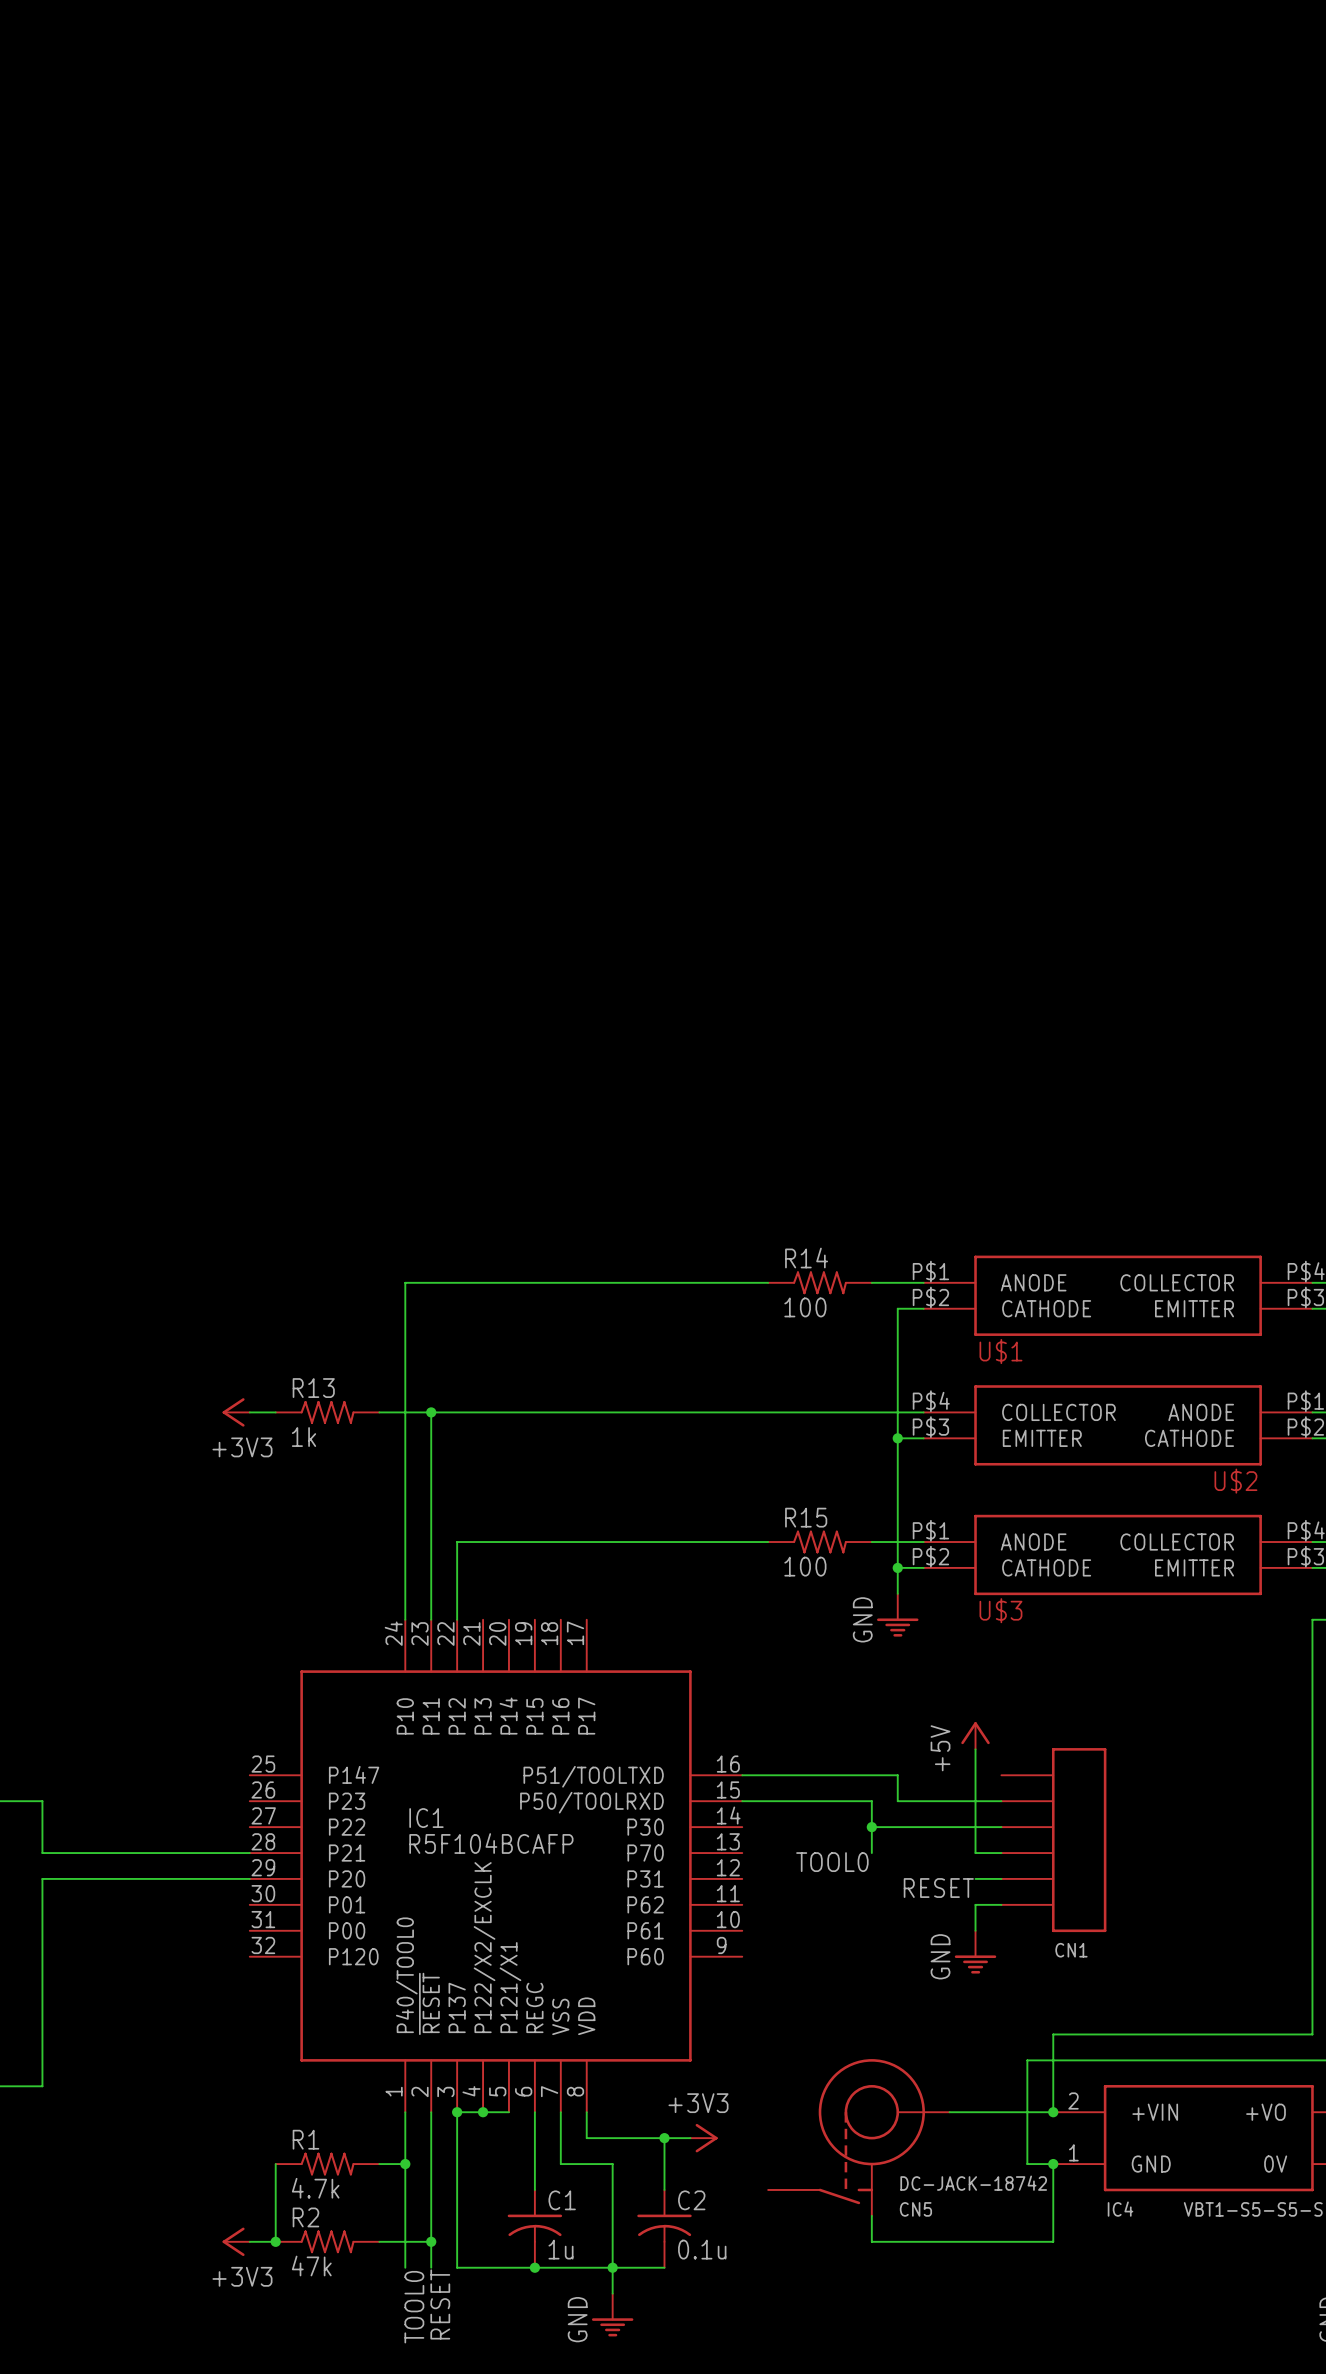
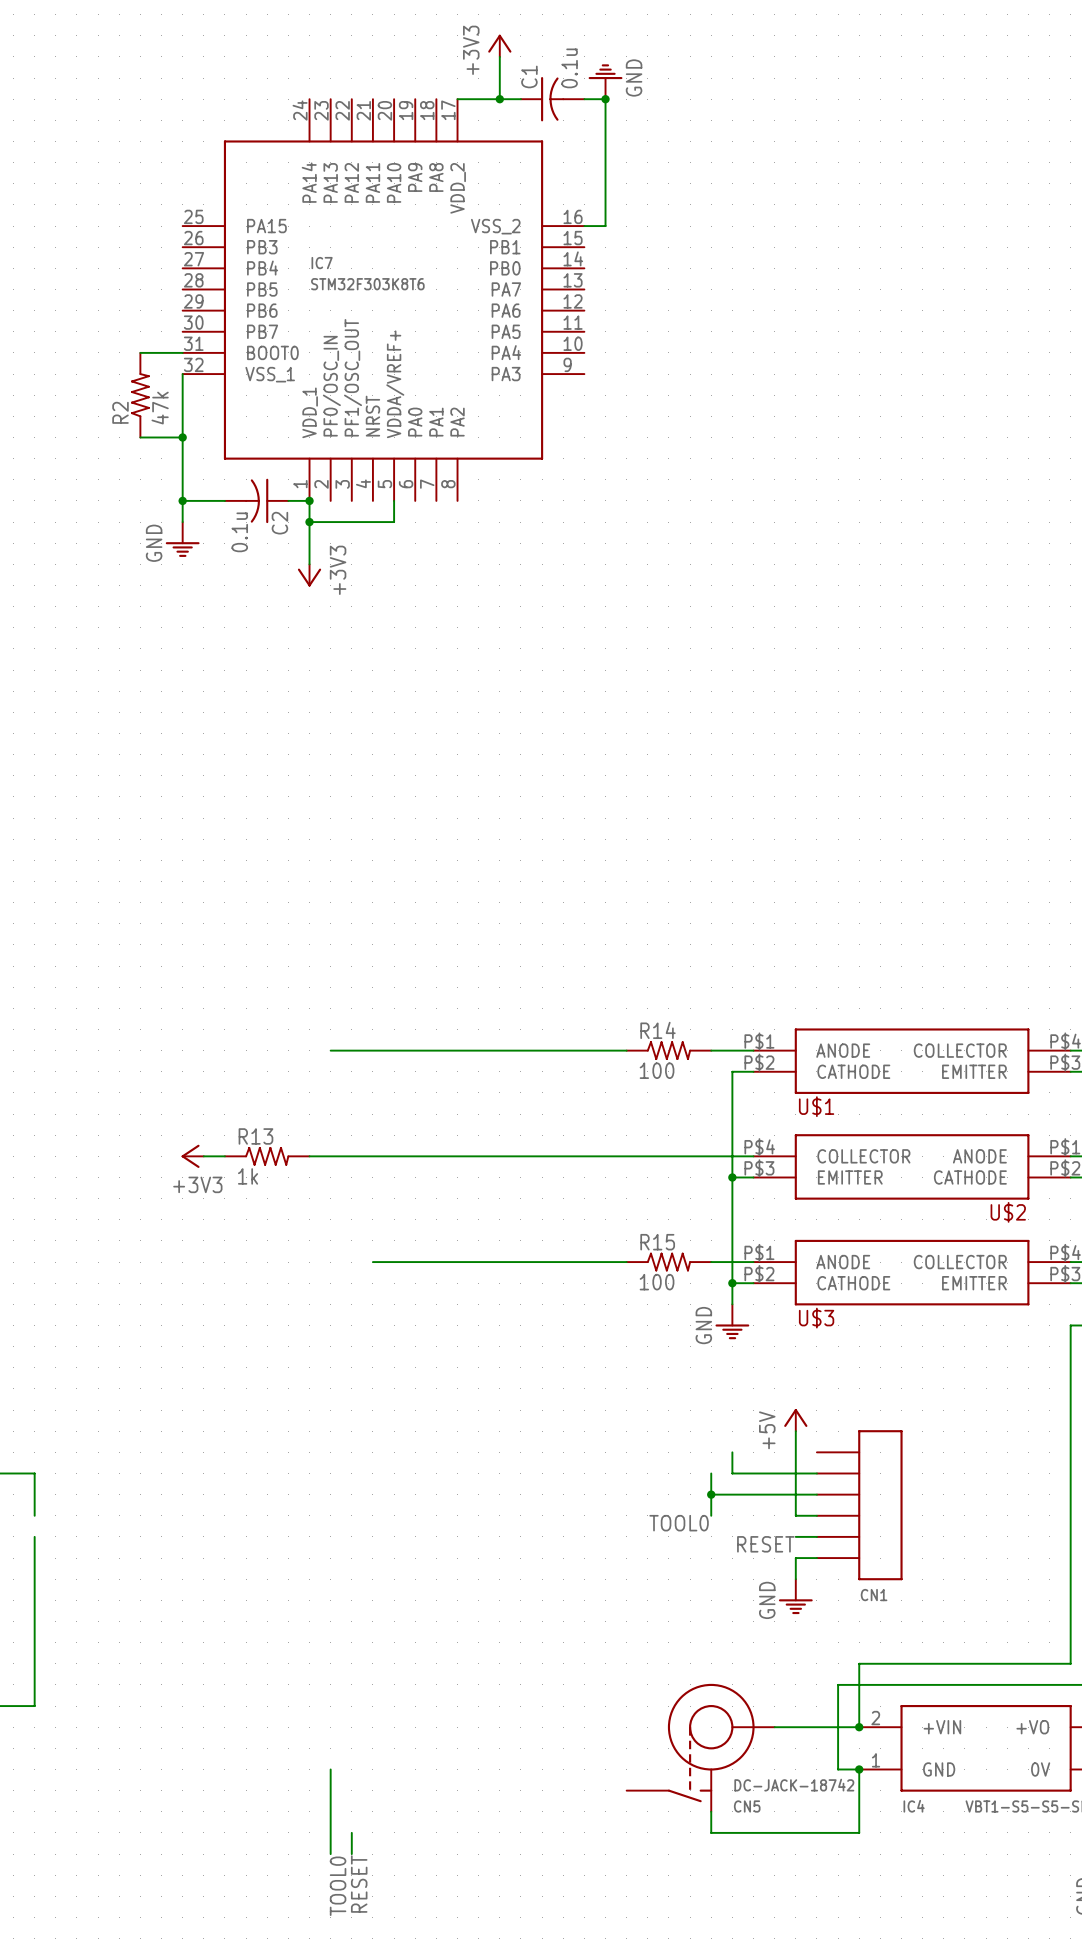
power symbol: none -> +3V3 (499, 45)
wire: none -> (499, 56) (499, 99)
power symbol: none -> GND (605, 81)
wire: none -> (457, 99) (520, 99)
junction: none -> (499, 99)
wire: none -> (584, 99) (605, 99) (605, 226) (584, 226)
junction: none -> (605, 99)
IC7: none -> STM32F303K8T6 (383, 300)
wire: none -> (140, 352) (182, 352)
wire: none -> (182, 374) (182, 522)
wire: none -> (140, 437) (182, 437)
junction: none -> (182, 437)
wire: none -> (182, 500) (224, 500)
junction: none -> (182, 500)
wire: none -> (288, 500) (309, 500) (309, 564)
junction: none -> (309, 500)
wire: none -> (394, 500) (394, 522) (309, 522)
junction: none -> (309, 522)
power symbol: none -> GND (182, 539)
power symbol: none -> +3V3 (309, 575)
wire: (405, 1282) (405, 1619) -> none
wire: (431, 1412) (431, 1619) -> none
junction: (431, 1412) -> none
wire: (457, 1542) (457, 1619) -> none
wire: (742, 1775) (897, 1775) -> none
wire: (742, 1801) (871, 1801) -> none
wire: (42, 1853) (249, 1853) -> none
IC1: R5F104BCAFP (496, 1865) -> none
wire: (42, 1878) (249, 1878) -> none
wire: (405, 2112) (405, 2164) (379, 2164) -> none
wire: (431, 2112) (431, 2241) (379, 2241) -> none
junction: (457, 2112) -> none
junction: (483, 2112) -> none
wire: (508, 2112) (457, 2112) (457, 2267) (664, 2267) -> none
wire: (534, 2112) (534, 2189) -> none
wire: (560, 2112) (560, 2164) (612, 2164) (612, 2293) -> none
wire: (586, 2112) (586, 2138) (690, 2138) -> none
wire: (664, 2138) (664, 2189) -> none
junction: (664, 2138) -> none
power symbol: +3V3 (704, 2138) -> none
wire: (275, 2164) (275, 2241) (249, 2241) -> none
R1: 4.7k (327, 2164) -> none
junction: (405, 2164) -> none
C1 rotation: 0° (534, 2228) -> 90° counterclockwise (552, 99)
C1 position: (534, 2228) -> (552, 99)
C2 rotation: 0° (664, 2228) -> 90° clockwise (256, 500)
C2 position: (664, 2228) -> (256, 500)
power symbol: +3V3 (236, 2241) -> none
junction: (275, 2241) -> none
R2 rotation: 0° (327, 2241) -> 90° counterclockwise (140, 395)
R2 position: (327, 2241) -> (140, 395)
junction: (431, 2241) -> none
C1 value: 1u (560, 2249) -> 0.1u (569, 68)
junction: (534, 2267) -> none
junction: (612, 2267) -> none
power symbol: GND (612, 2315) -> none

